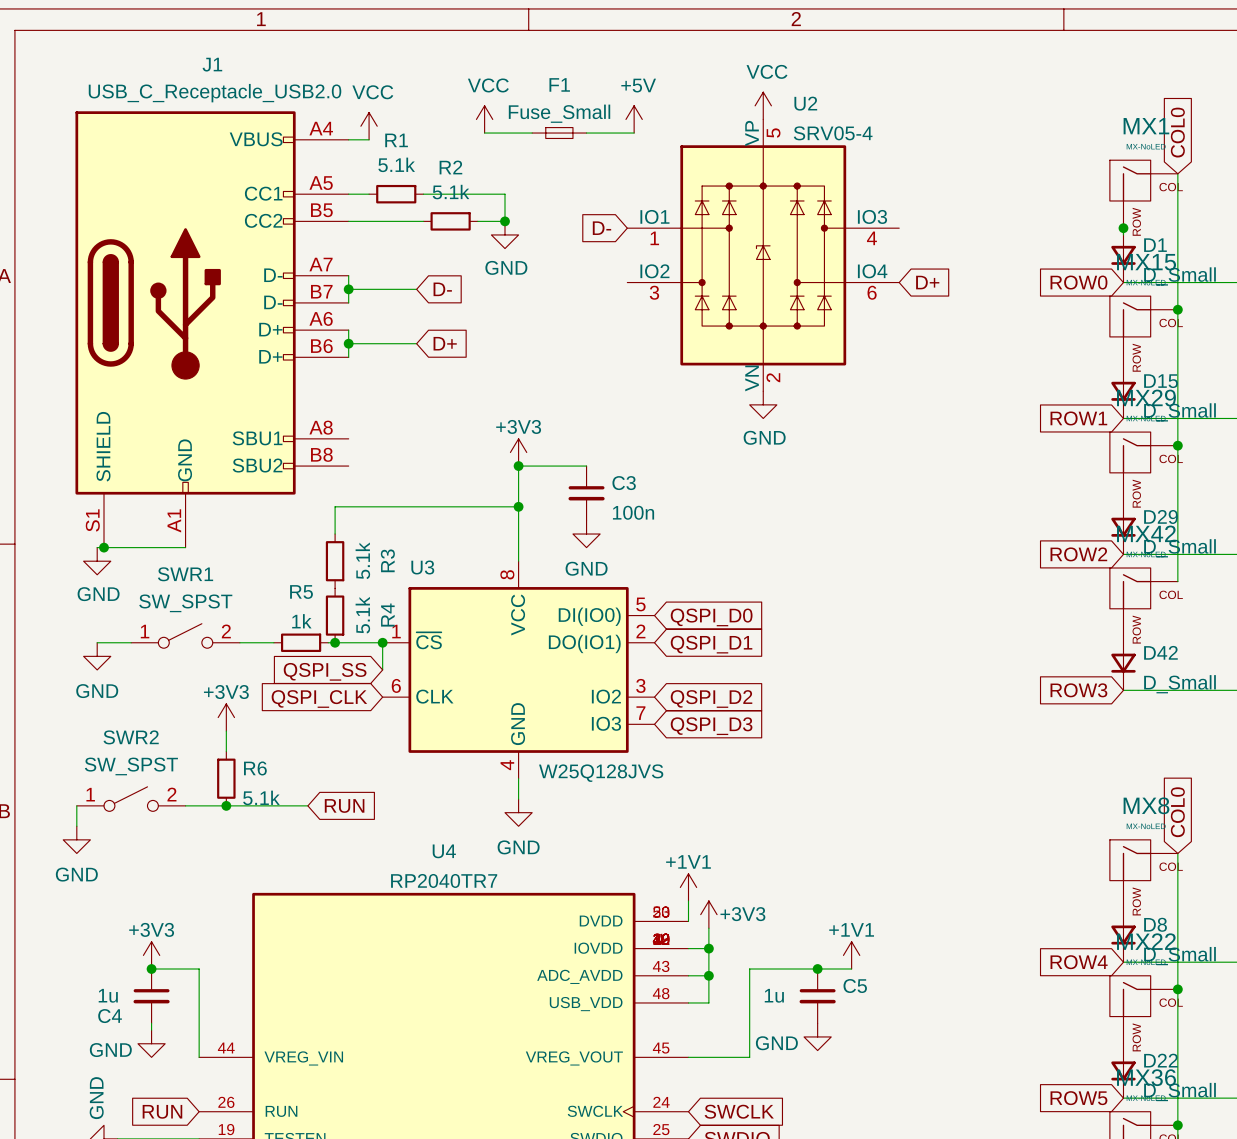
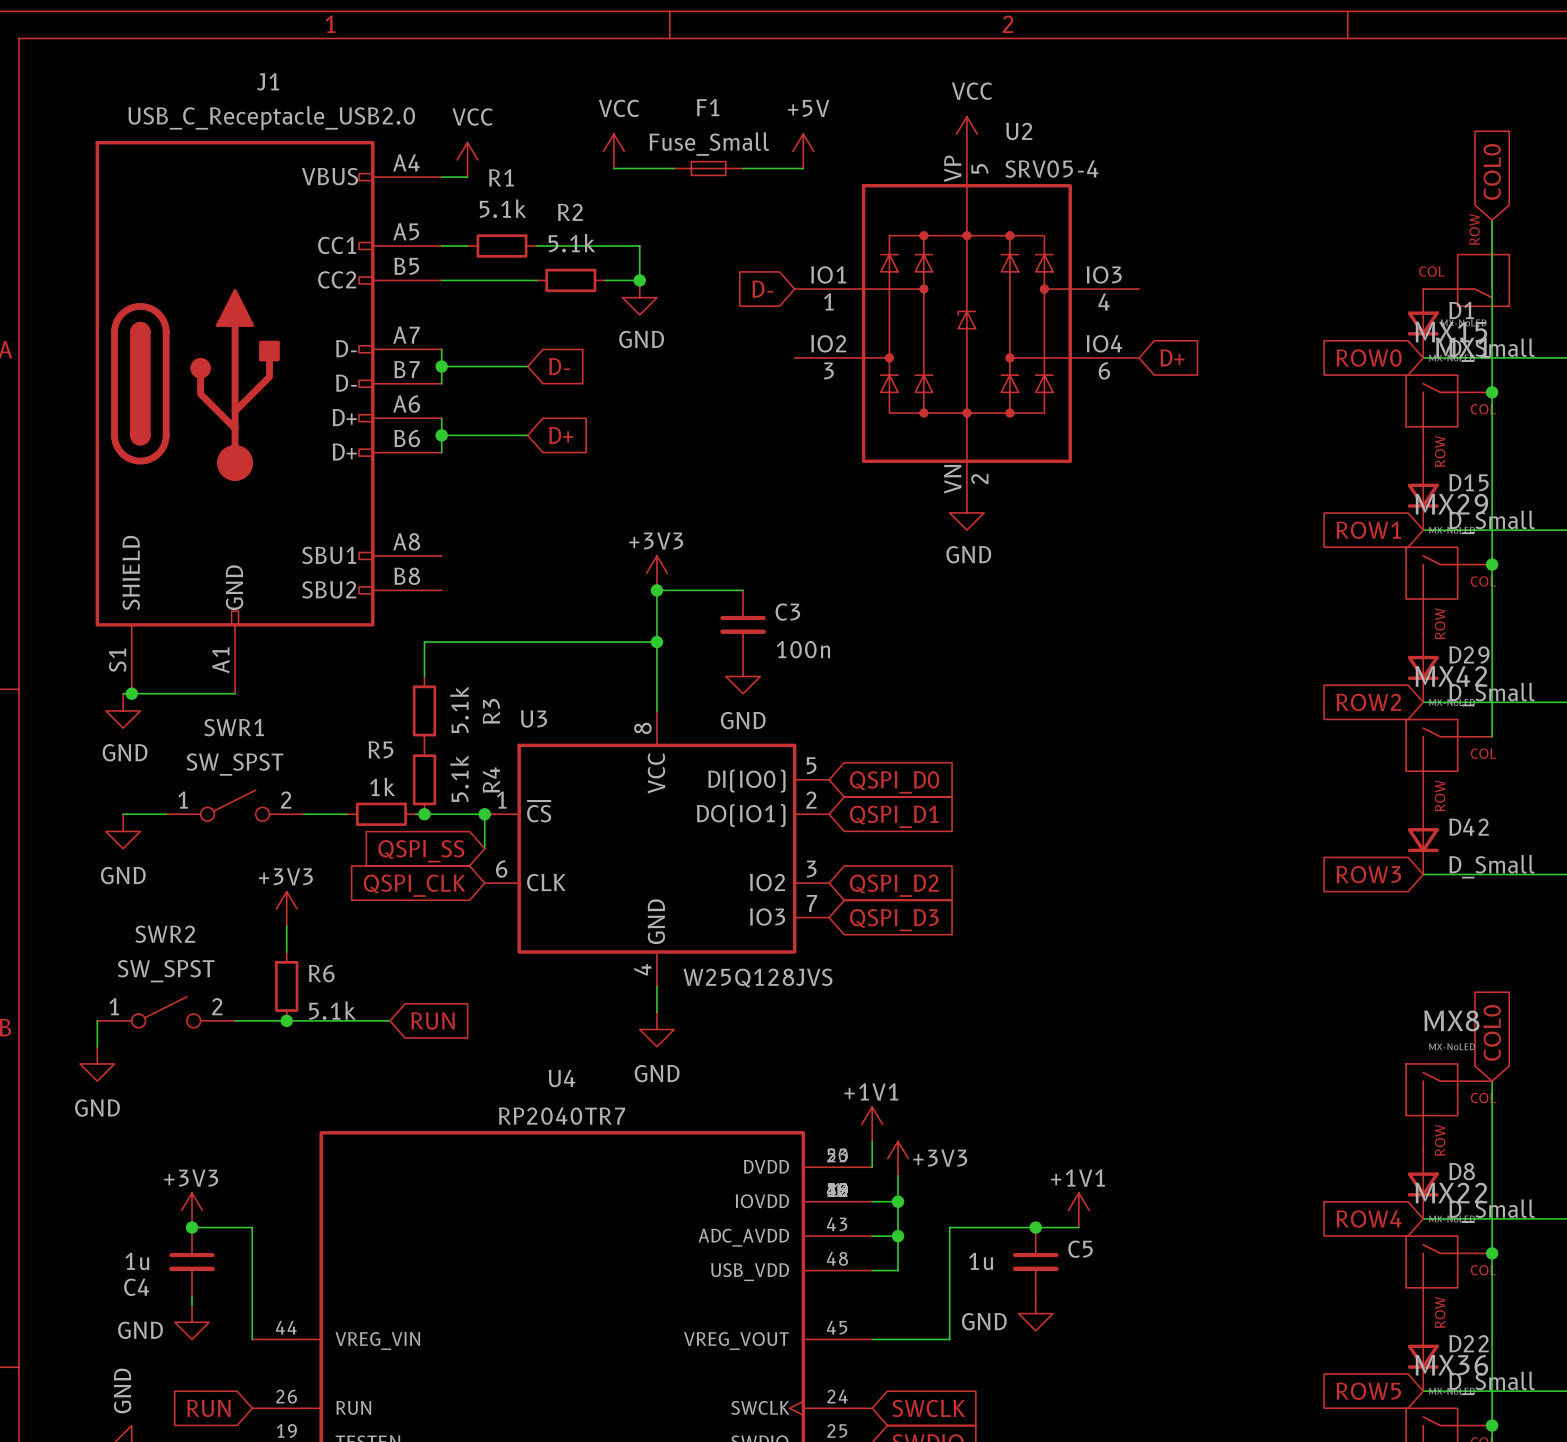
MX1 rotation: 0° (1130, 180) -> 180° (1483, 280)
junction: (1123, 228) -> none

